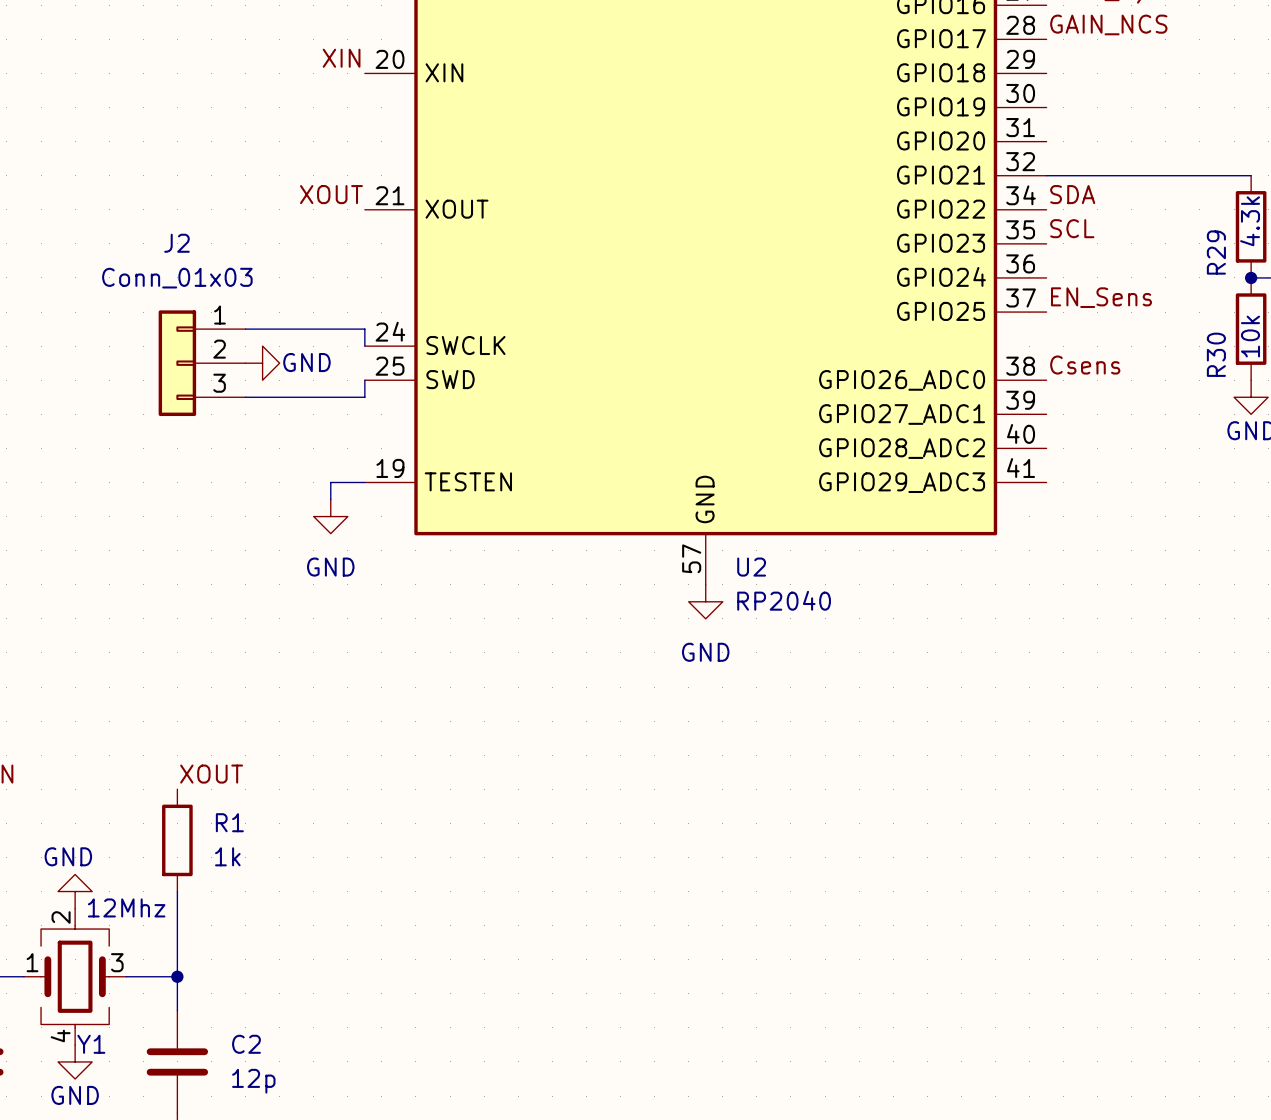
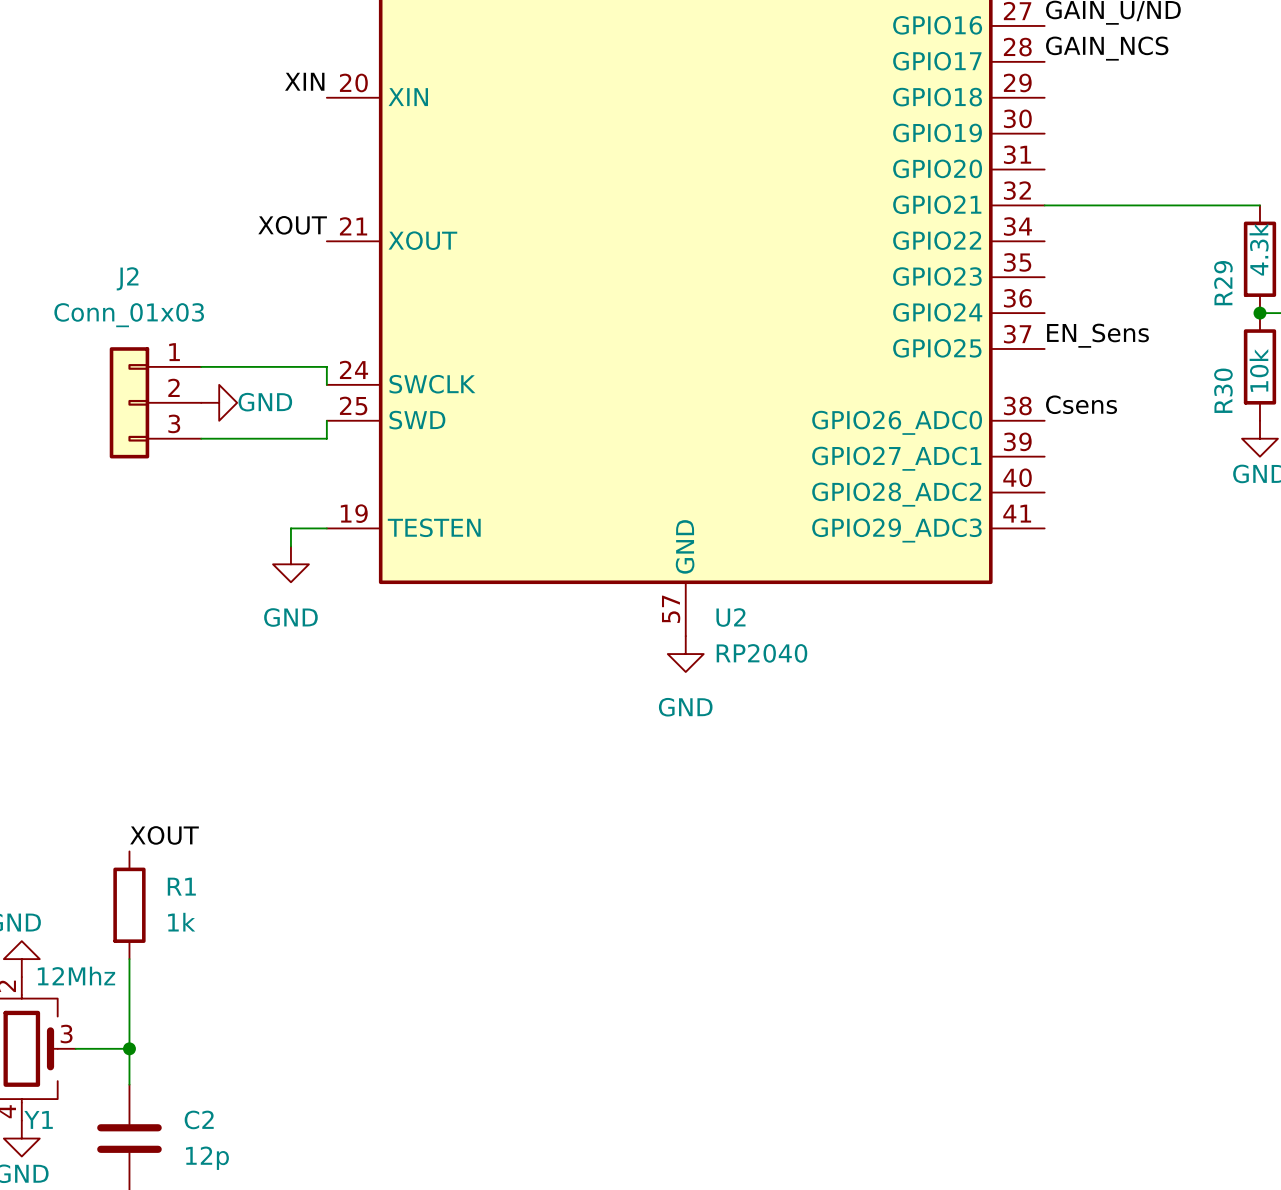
label: SDA (1072, 194) -> none
label: SCL (1072, 228) -> none

